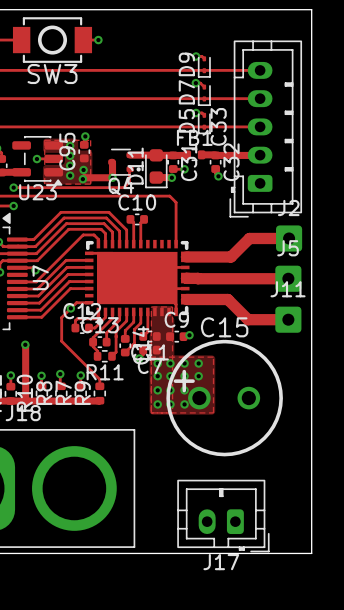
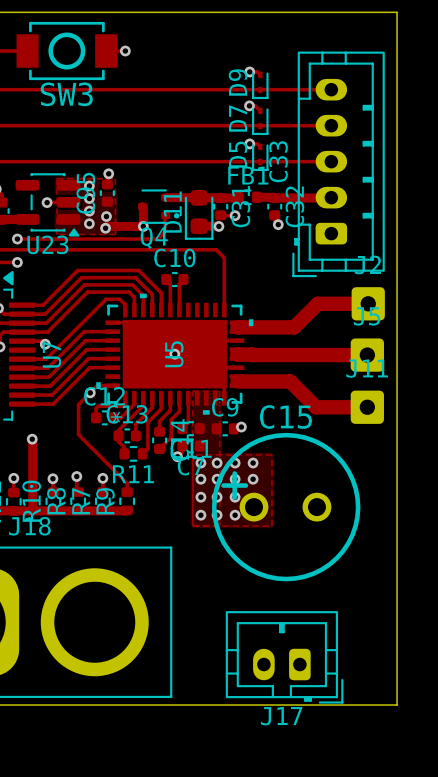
U5: none -> (174, 354)
via: none -> (174, 354)
part: (137, 282) -> none

